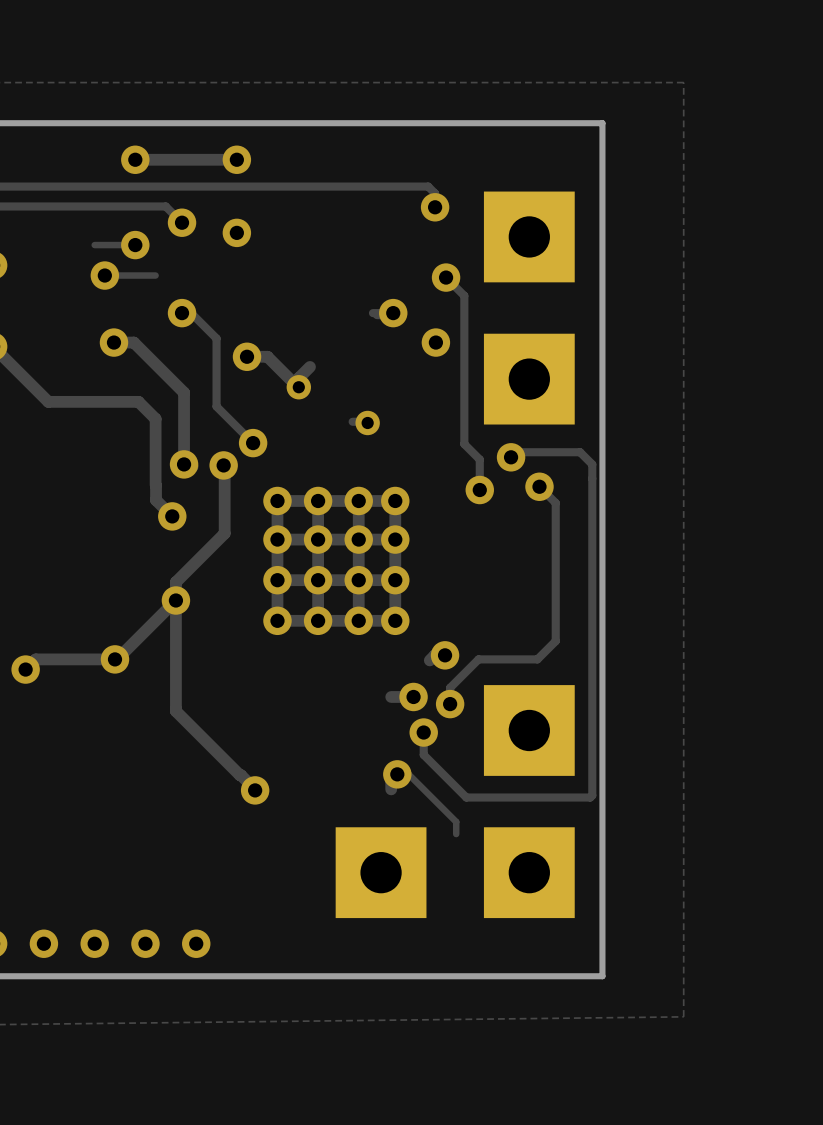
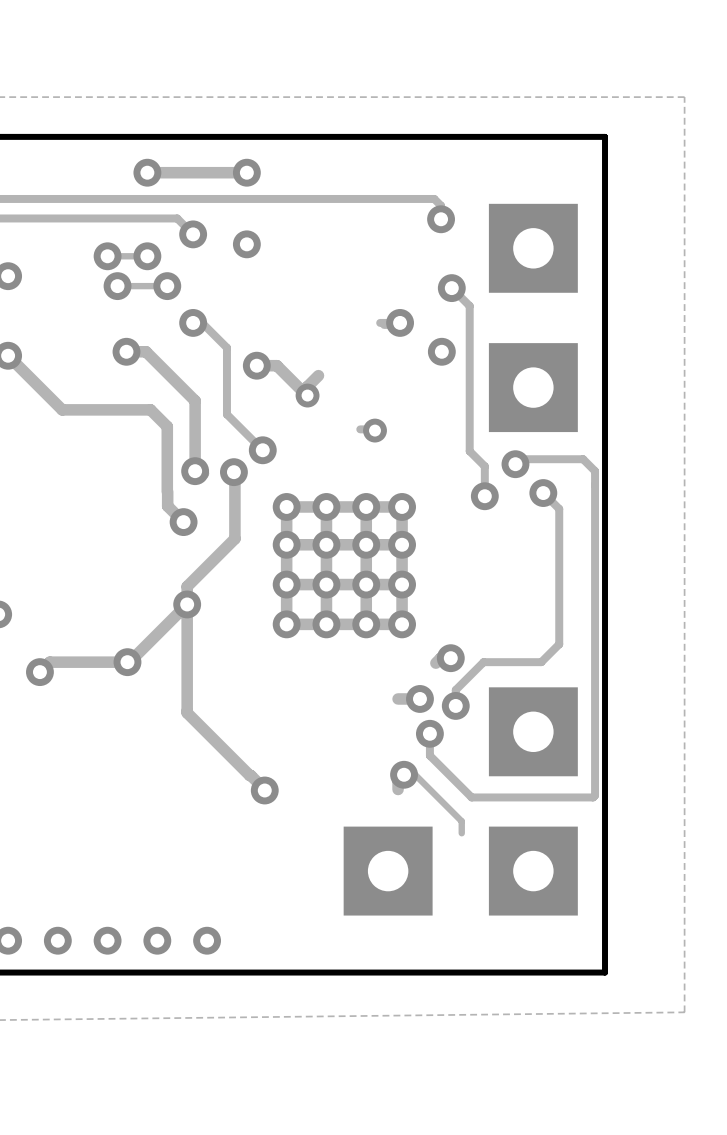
via: none -> (107, 256)
via: none -> (167, 286)

